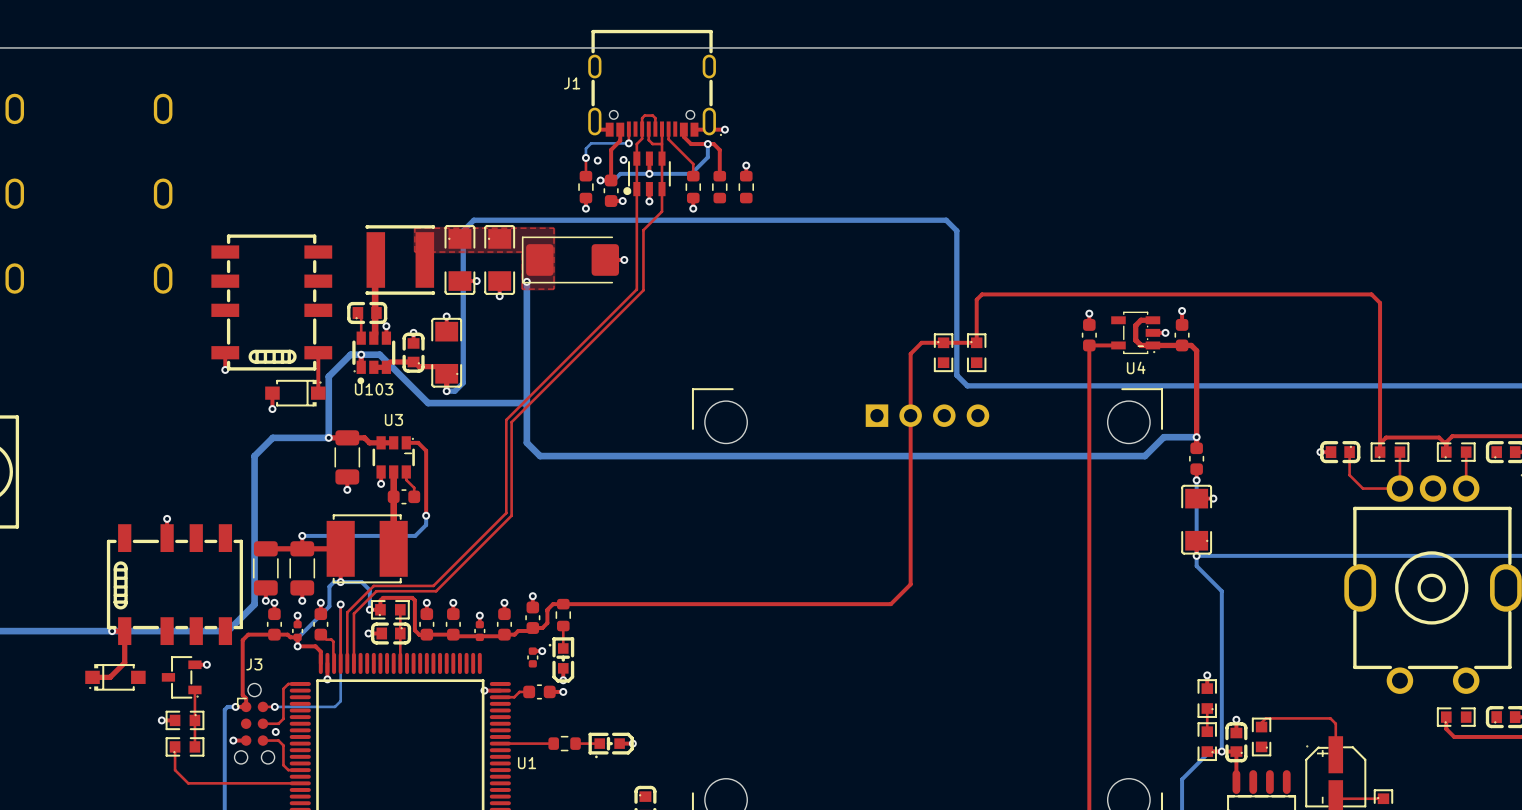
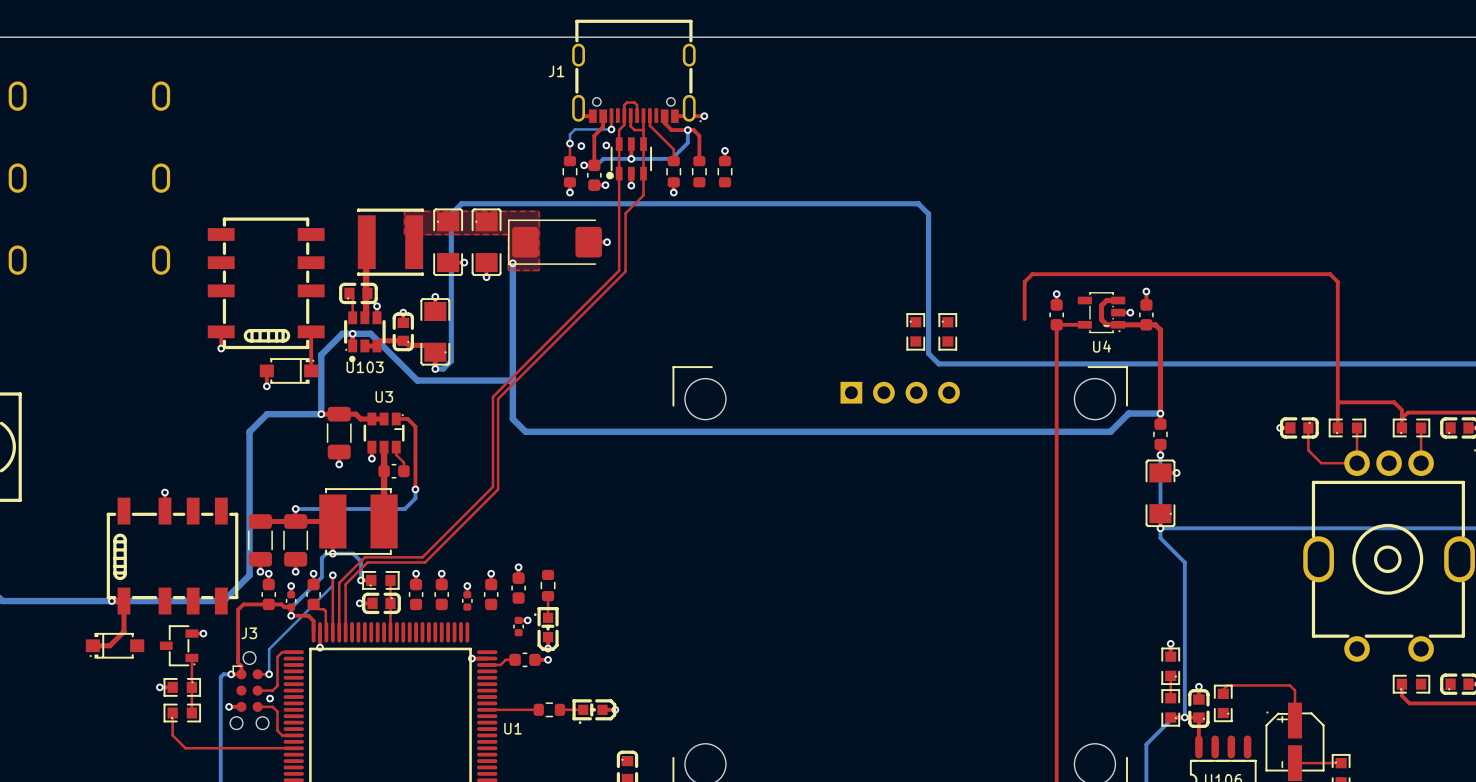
top track: (1380, 302) (1371, 294) (982, 294) (976, 299) (976, 342) (921, 342) (910, 353) (910, 584) (890, 604) (553, 604) (547, 609) (547, 623) (542, 628) (518, 630) (514, 634) (479, 637) (453, 634) (419, 634) (414, 630) (414, 600) (412, 597) (383, 597) (380, 600) (380, 609) -> (1337, 283) (1330, 274) (1032, 274) (1024, 281) (1024, 319)
top track: none -> (1337, 402) (1394, 402) (1401, 410) (1401, 418)
top track: (1380, 443) (1386, 437) (1439, 437) (1446, 444) -> none
bottom track: (340, 615) (340, 701) (334, 706) (274, 706) -> (332, 585) (269, 649) (269, 674)

